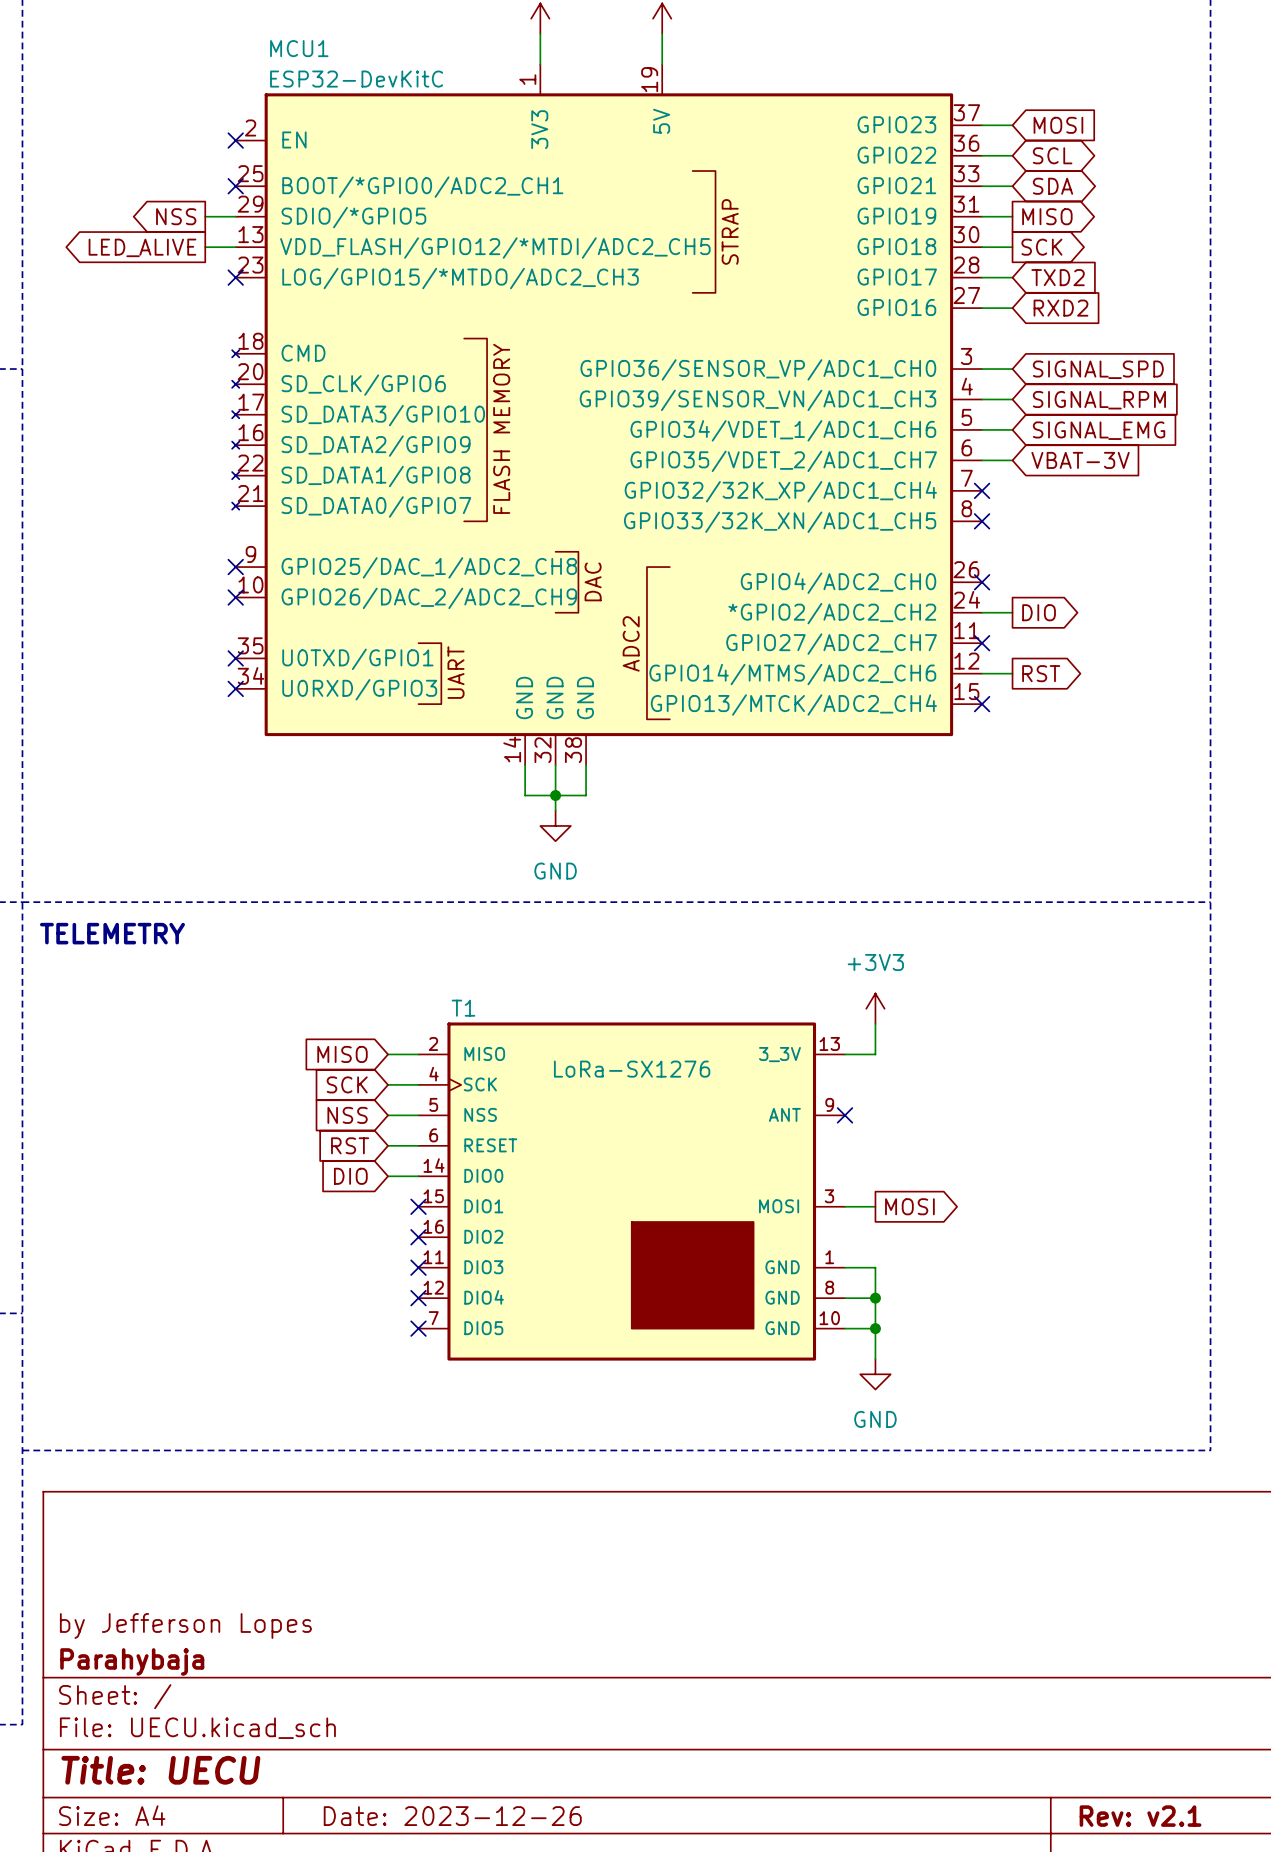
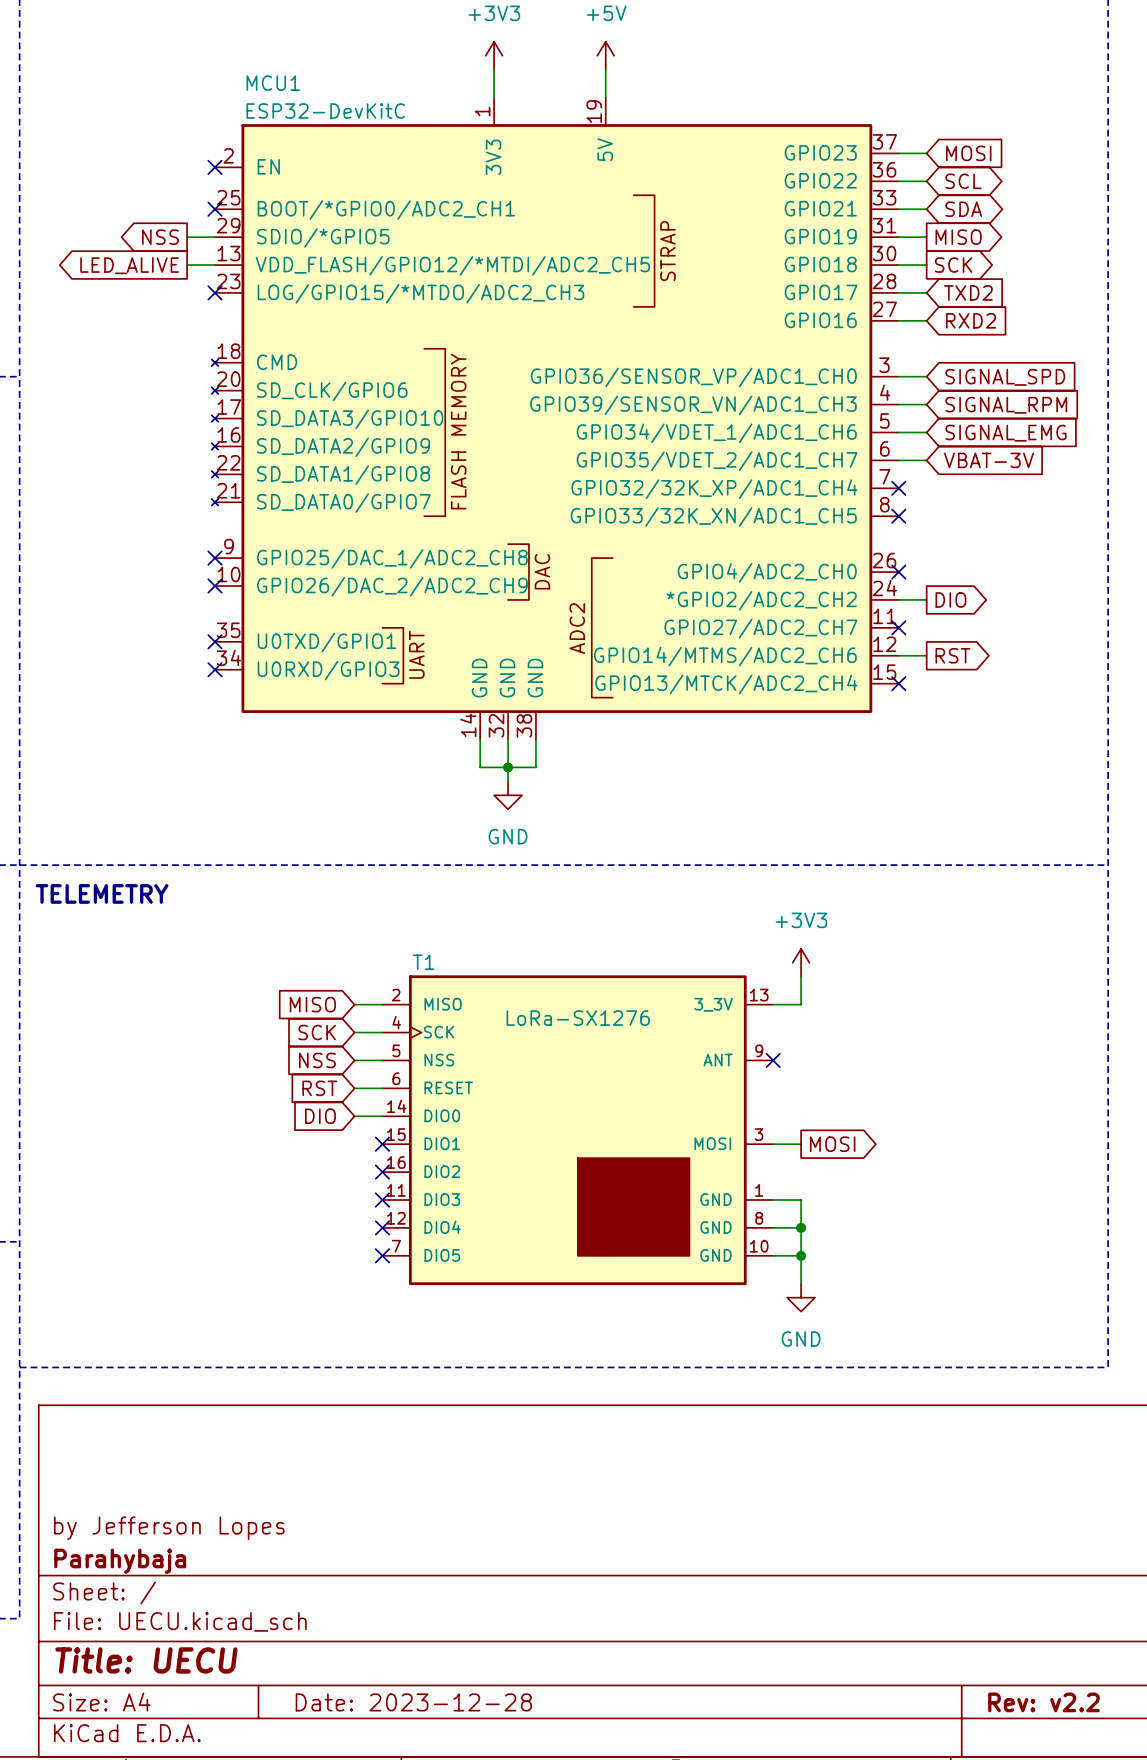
title block: Date: 2023-12-26 (452, 1816) -> Date: 2023-12-28 (413, 1702)
title block: Rev: v2.1 (1140, 1816) -> Rev: v2.2 (1043, 1702)

